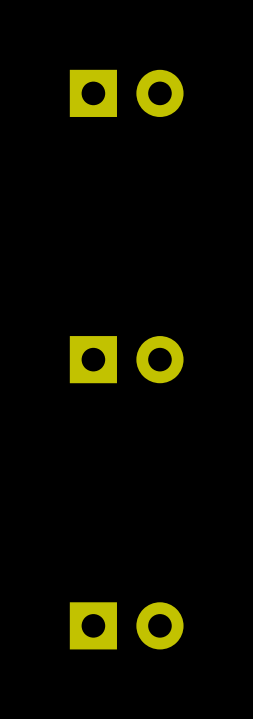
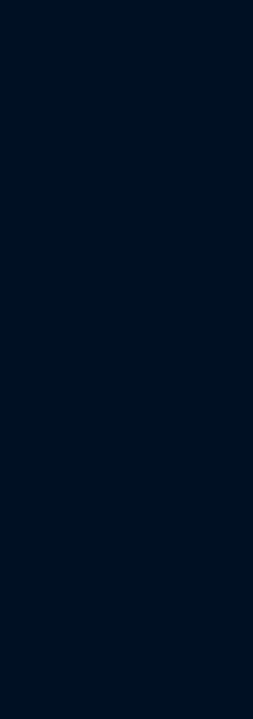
part: (126, 93) -> none
part: (126, 359) -> none
part: (126, 625) -> none

